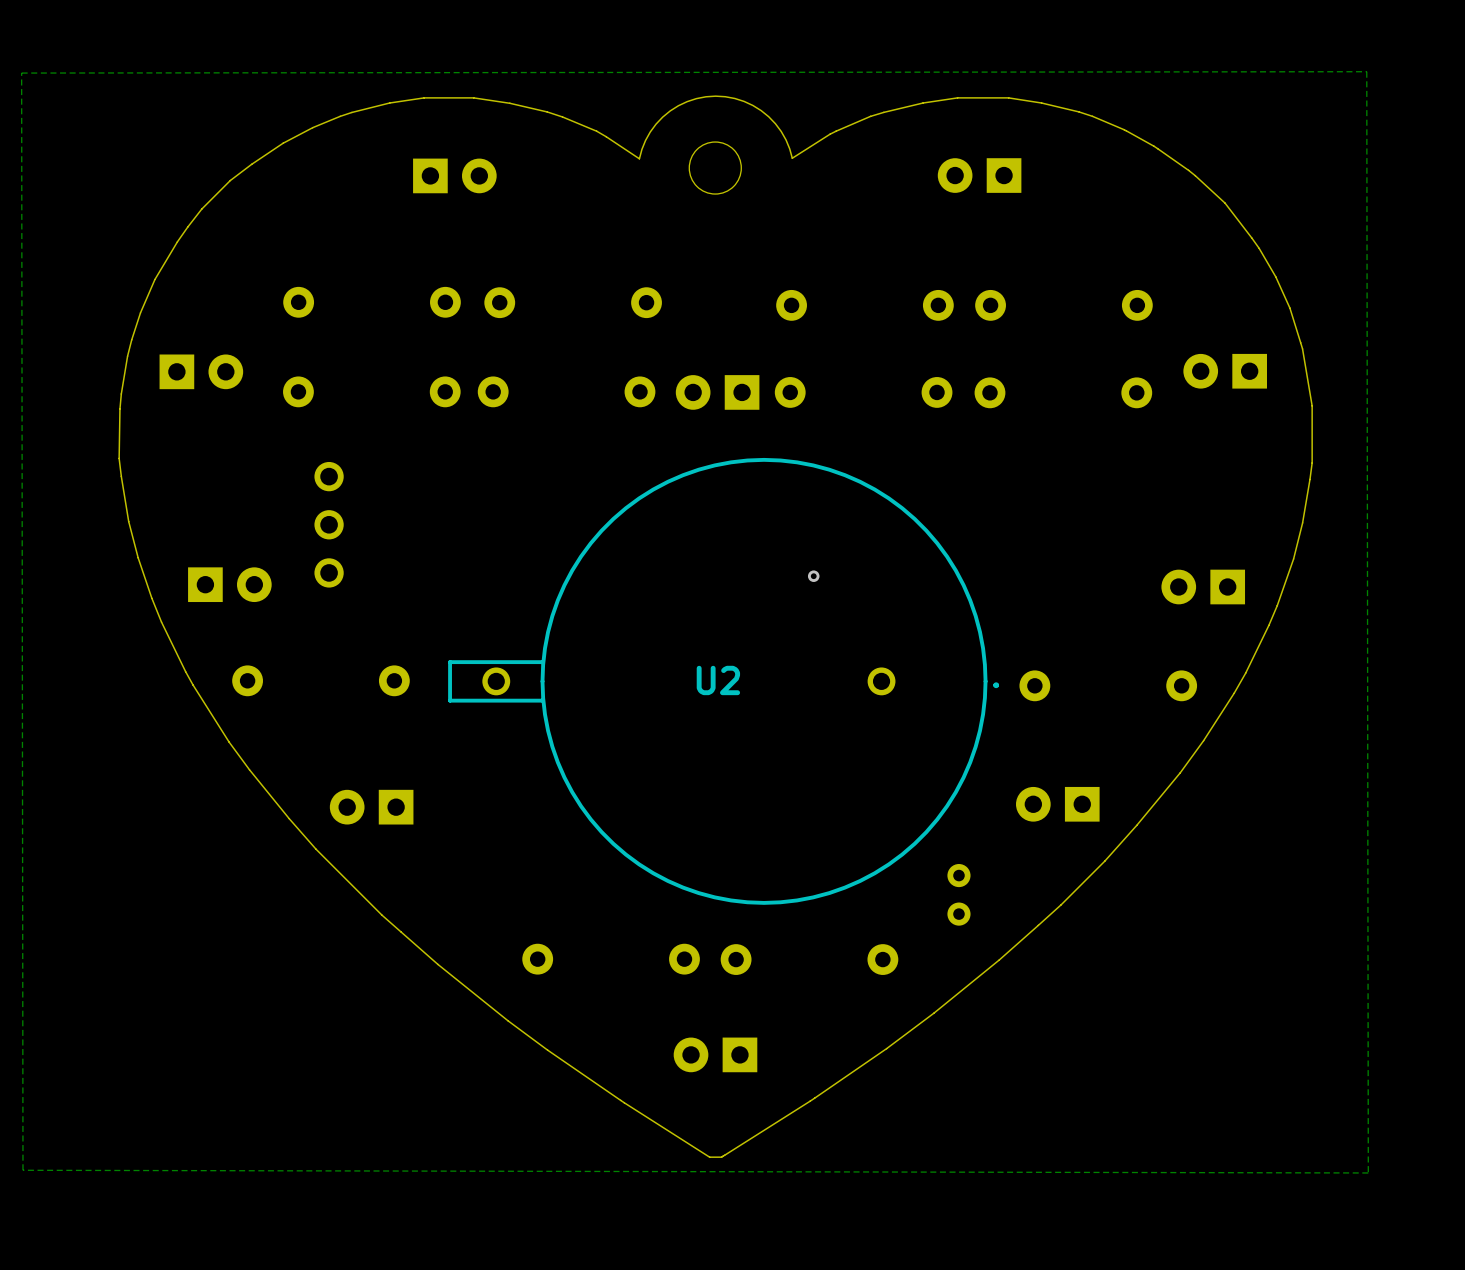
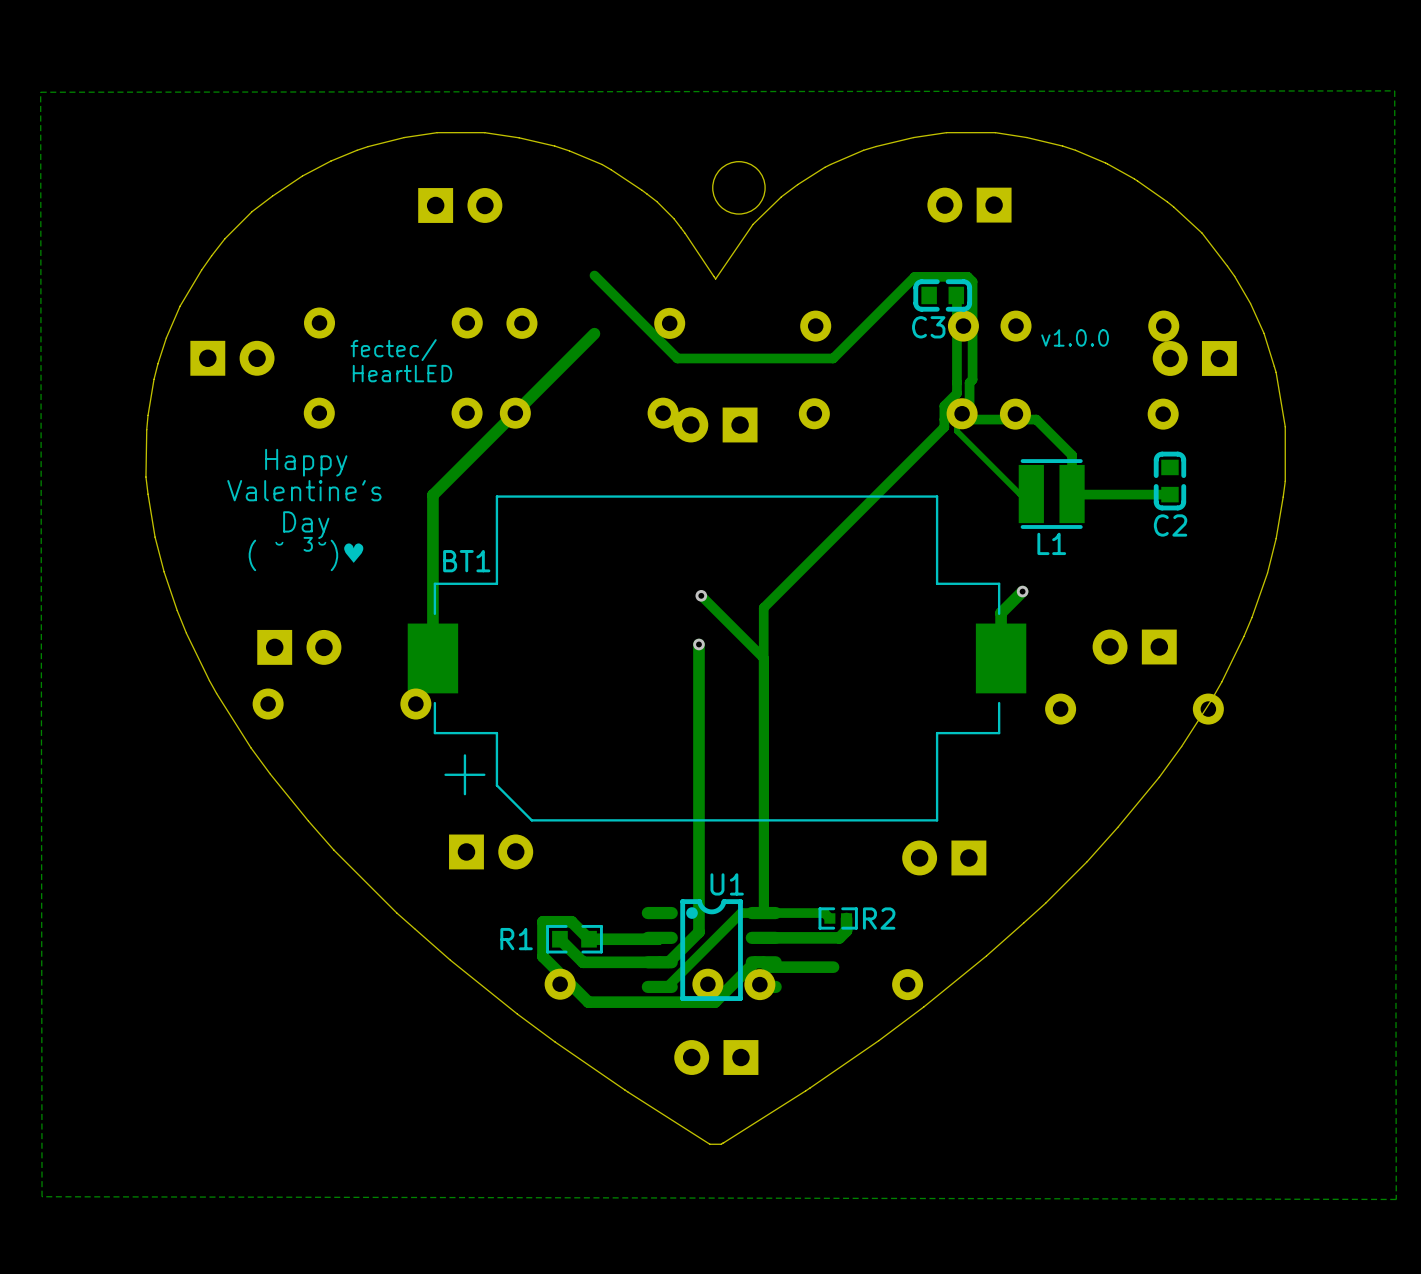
board edge: (1008, 97) (957, 97) (923, 103) (883, 112) (829, 134) (792, 158) (781, 131) (768, 116) (744, 101) (725, 96) (696, 98) (670, 110) (650, 131) (639, 158) (596, 131) (547, 111) (509, 103) (473, 97) (424, 97) (389, 103) (351, 112) (312, 127) (283, 143) (230, 180) (201, 209) (177, 241) (154, 279) (131, 339) (121, 393) (119, 458) (128, 521) (138, 557) (161, 622) (193, 685) (229, 742) (249, 769) (315, 849) (382, 915) (437, 964) (547, 1050) (624, 1102) (709, 1157) (721, 1157) (810, 1101) (886, 1048) (999, 959) (1061, 904) (1104, 861) (1180, 772) (1234, 693) (1268, 625) (1293, 559) (1302, 522) (1312, 463) (1312, 405) (1302, 348) (1289, 308) (1275, 276) (1259, 248) (1225, 203) (1195, 175) (1154, 146) (1124, 129) (1092, 116) (1041, 103) (1008, 97) -> (995, 132) (1026, 137) (1075, 150) (1105, 163) (1134, 178) (1173, 206) (1202, 233) (1234, 276) (1250, 303) (1264, 333) (1276, 372) (1285, 426) (1285, 481) (1276, 538) (1267, 573) (1243, 636) (1210, 701) (1159, 777) (1087, 861) (1045, 903) (986, 955) (878, 1040) (805, 1090) (721, 1144) (709, 1144) (628, 1092) (555, 1042) (450, 960) (397, 913) (333, 850) (270, 774) (251, 747) (216, 693) (186, 633) (164, 571) (155, 537) (145, 477) (148, 415) (157, 363) (180, 306) (201, 270) (224, 238) (252, 211) (302, 175) (330, 161) (368, 146) (404, 137) (437, 132) (484, 132) (519, 137) (569, 150) (602, 164) (656, 201) (680, 227) (715, 279) (752, 224) (781, 196) (824, 167) (863, 150) (913, 137) (946, 132) (995, 132)
part position: (454, 175) -> (460, 205)
part position: (979, 175) -> (969, 205)
track: none -> (594, 275) (677, 358) (833, 358) (914, 276) (967, 276) (972, 281) (972, 379) (969, 382) (969, 419) (1036, 419) (1072, 455) (1072, 494)
C3: none -> (942, 295)
track: none -> (956, 296) (956, 393) (944, 405) (944, 427) (763, 607) (763, 913)
track: none -> (594, 333) (432, 495) (432, 658)
text: none -> v1.0.0 (1075, 337)
text: none -> fectec/ (393, 350)
text: none -> HeartLED (402, 373)
part position: (201, 371) -> (232, 358)
part position: (1225, 371) -> (1194, 358)
part position: (717, 392) -> (715, 424)
track: none -> (956, 419) (956, 431) (1019, 494) (1031, 494)
text: none -> Happy (306, 462)
C2: none -> (1169, 481)
text: none -> Valentine's (304, 490)
L1: none -> (1051, 494)
track: none -> (1169, 494) (1072, 494)
text: none -> Day (306, 525)
part: (329, 524) -> none
text: none -> ( ˘ ³˘)♥ (306, 554)
track: none -> (1022, 591) (1001, 613) (1001, 658)
via: none -> (1022, 591)
track: none -> (701, 595) (763, 658)
via: none -> (701, 595)
via: (813, 576) -> none
part position: (229, 584) -> (299, 647)
part: (1203, 587) -> none
track: none -> (698, 644) (698, 932) (668, 962) (583, 962) (559, 939)
via: none -> (698, 644)
part: none -> (1134, 647)
BT1: none -> (717, 658)
U2: (723, 681) -> none
part: (1057, 804) -> none
part rotation: 0° (371, 807) -> 180° (491, 851)
part position: (371, 807) -> (491, 851)
part: none -> (944, 857)
track: none -> (829, 918) (824, 913) (741, 913) (667, 986) (659, 986)
R2: none -> (838, 918)
track: none -> (846, 918) (846, 930) (839, 937) (763, 937)
part: (958, 894) -> none
track: none -> (659, 937) (589, 939) (571, 921) (542, 921) (542, 956) (588, 1002) (715, 1002) (754, 962) (763, 962) (768, 967) (833, 967)
R1: none -> (574, 939)
U1: none -> (711, 950)
part position: (715, 1054) -> (716, 1057)

